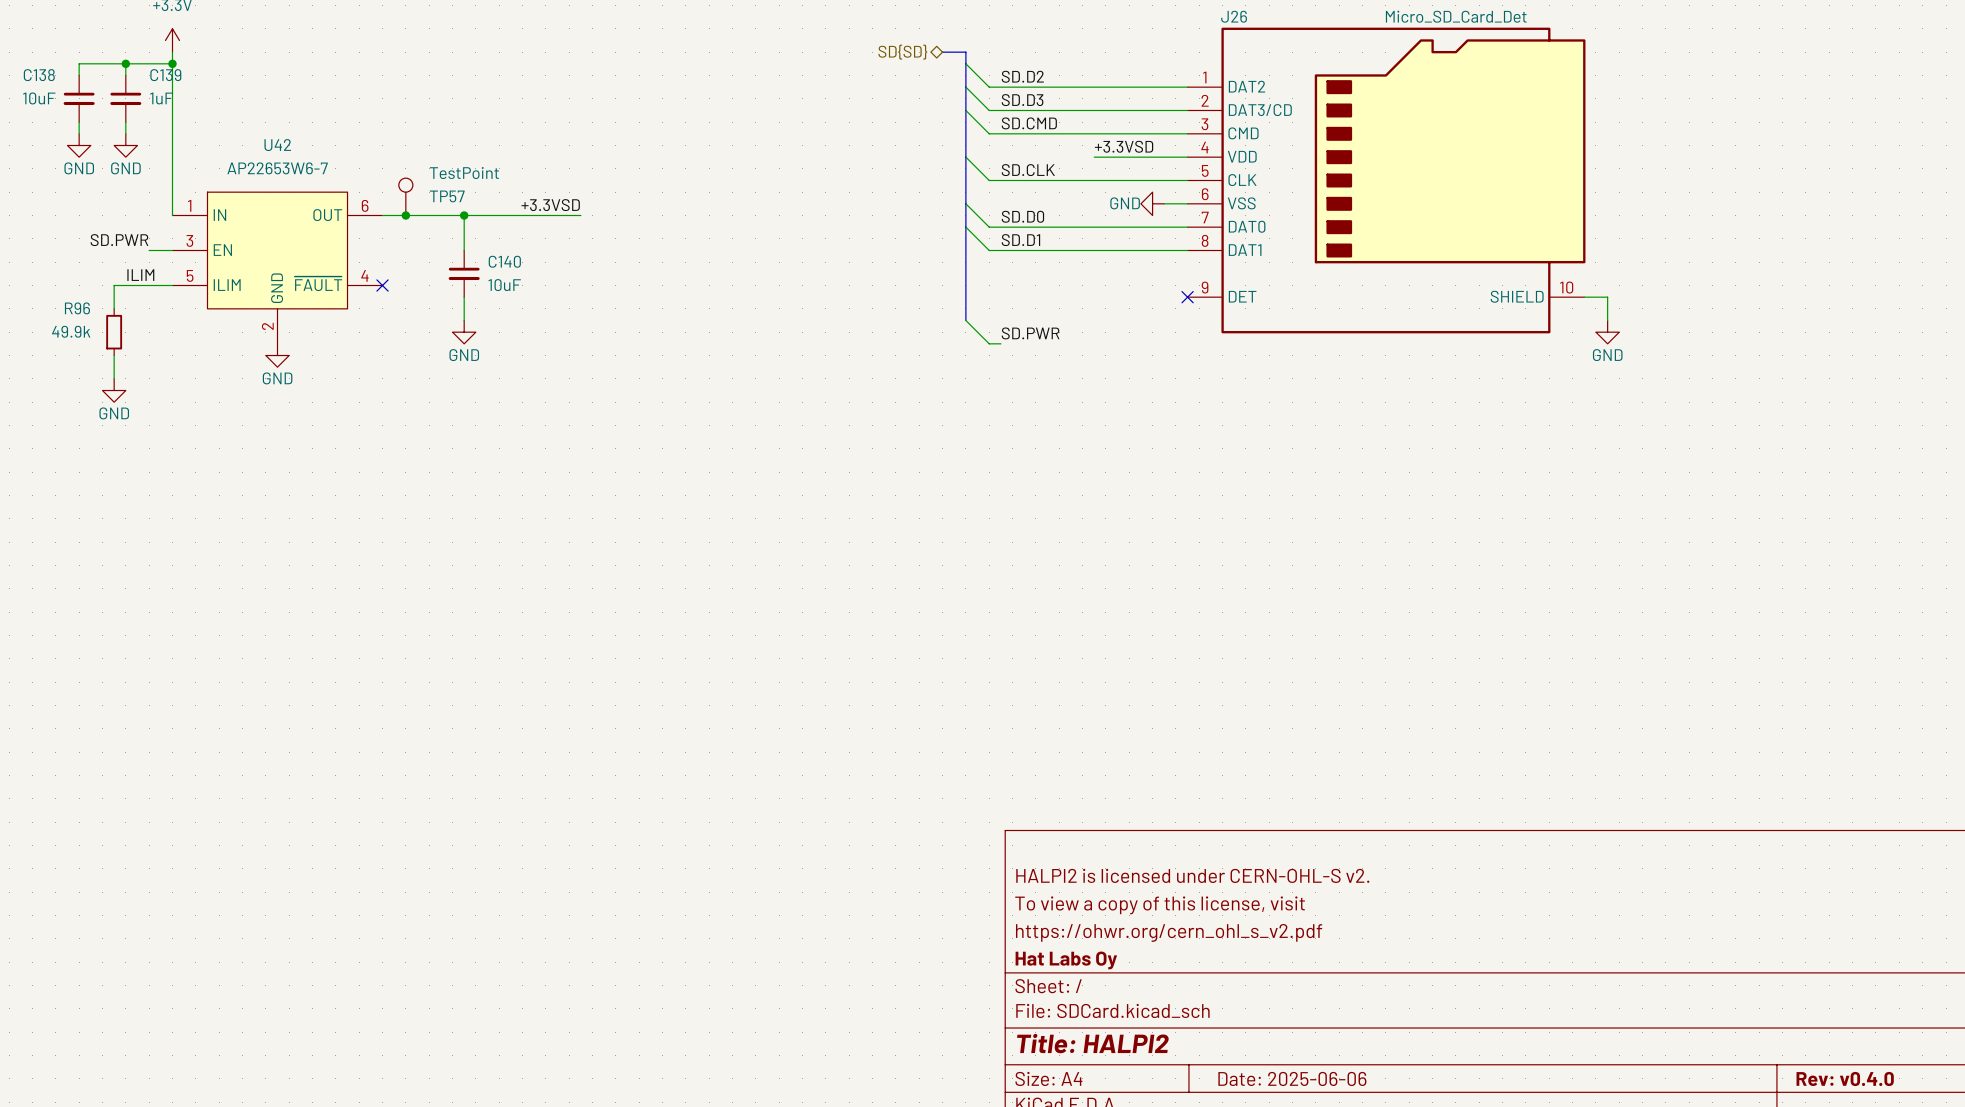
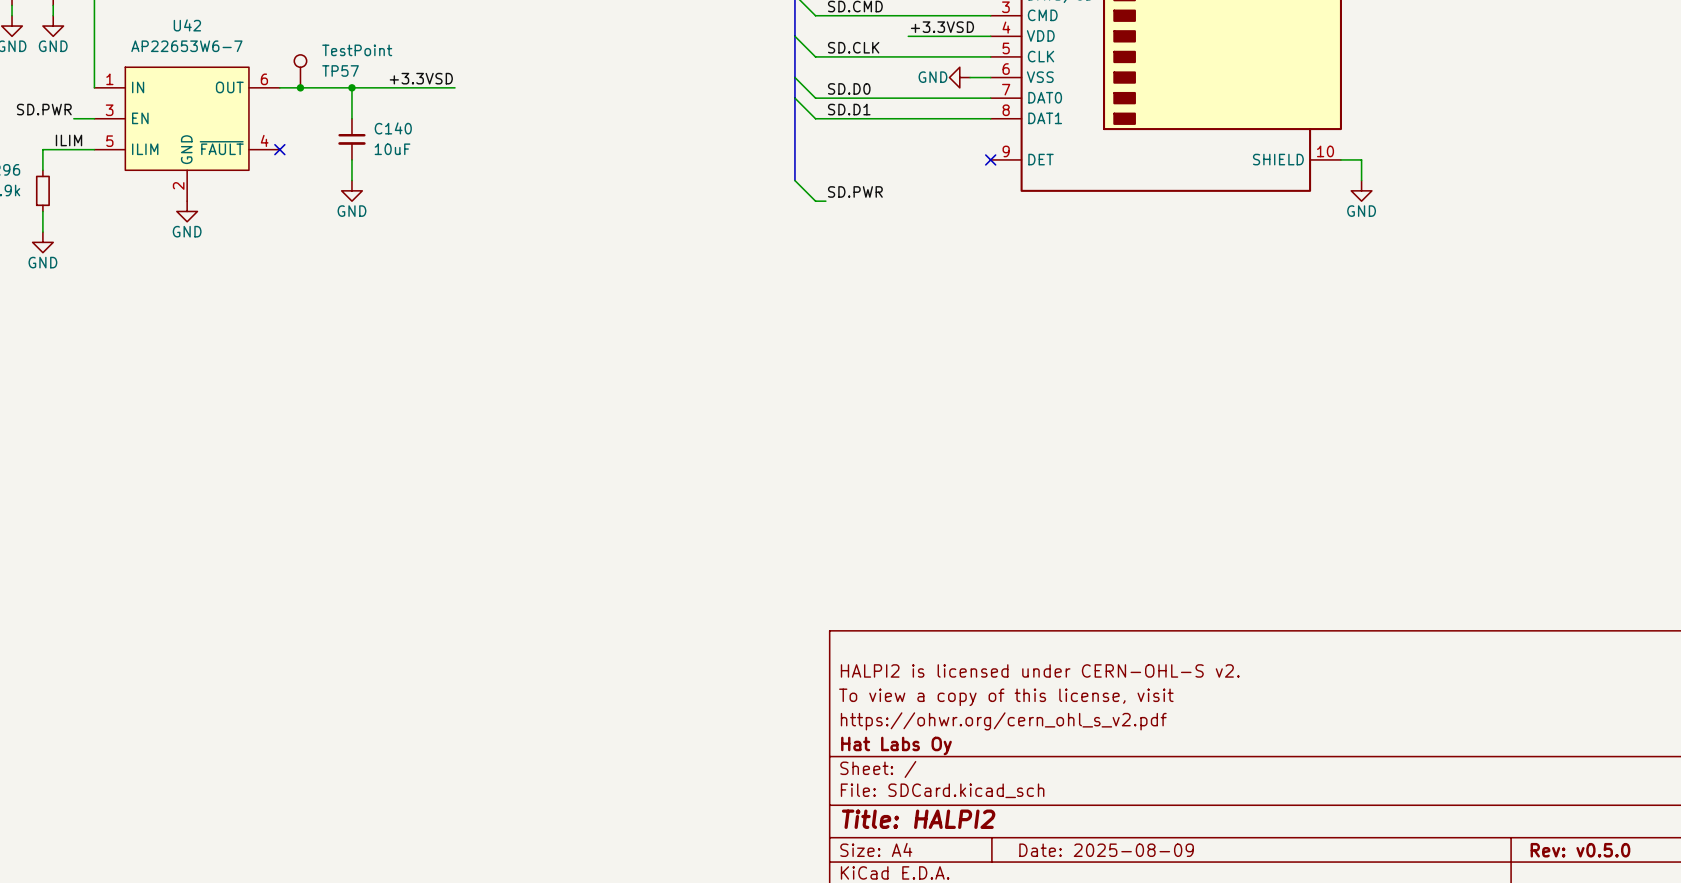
title block: Date: 2025-06-06 (1292, 1078) -> Date: 2025-08-09 (1106, 850)
title block: Rev: v0.4.0 (1845, 1078) -> Rev: v0.5.0 (1580, 850)

